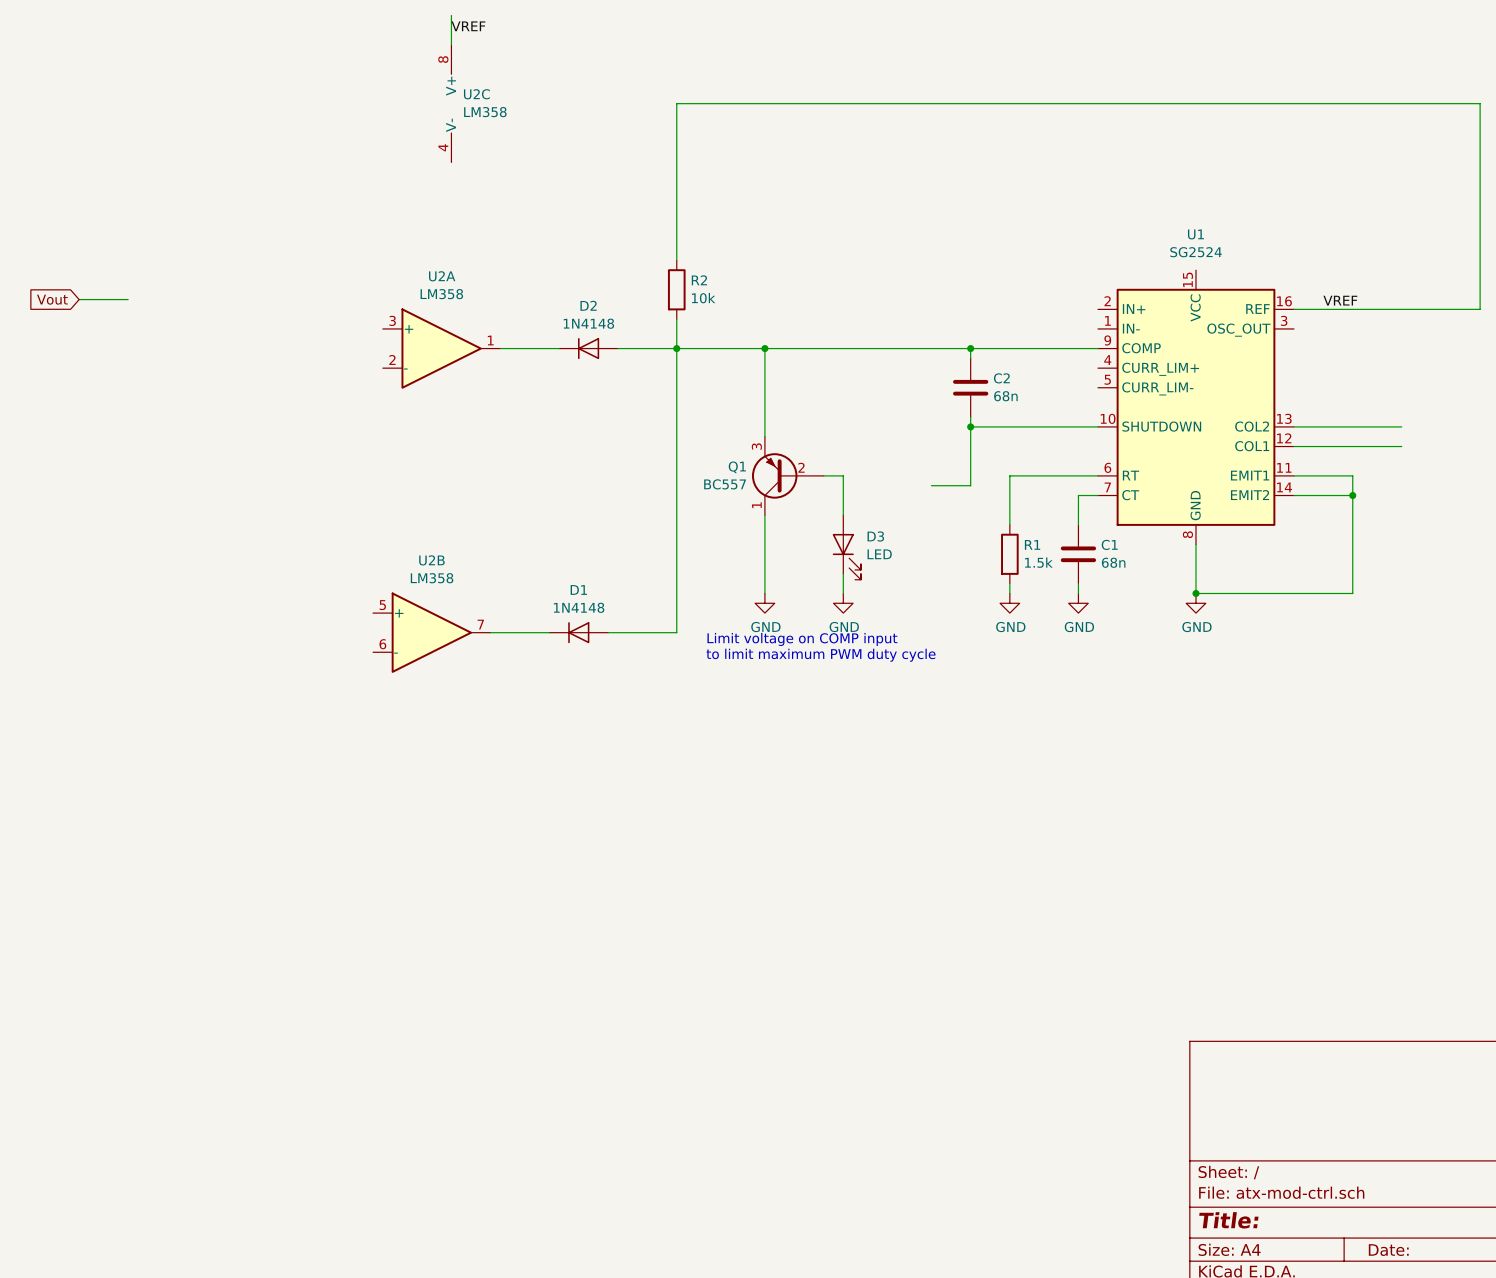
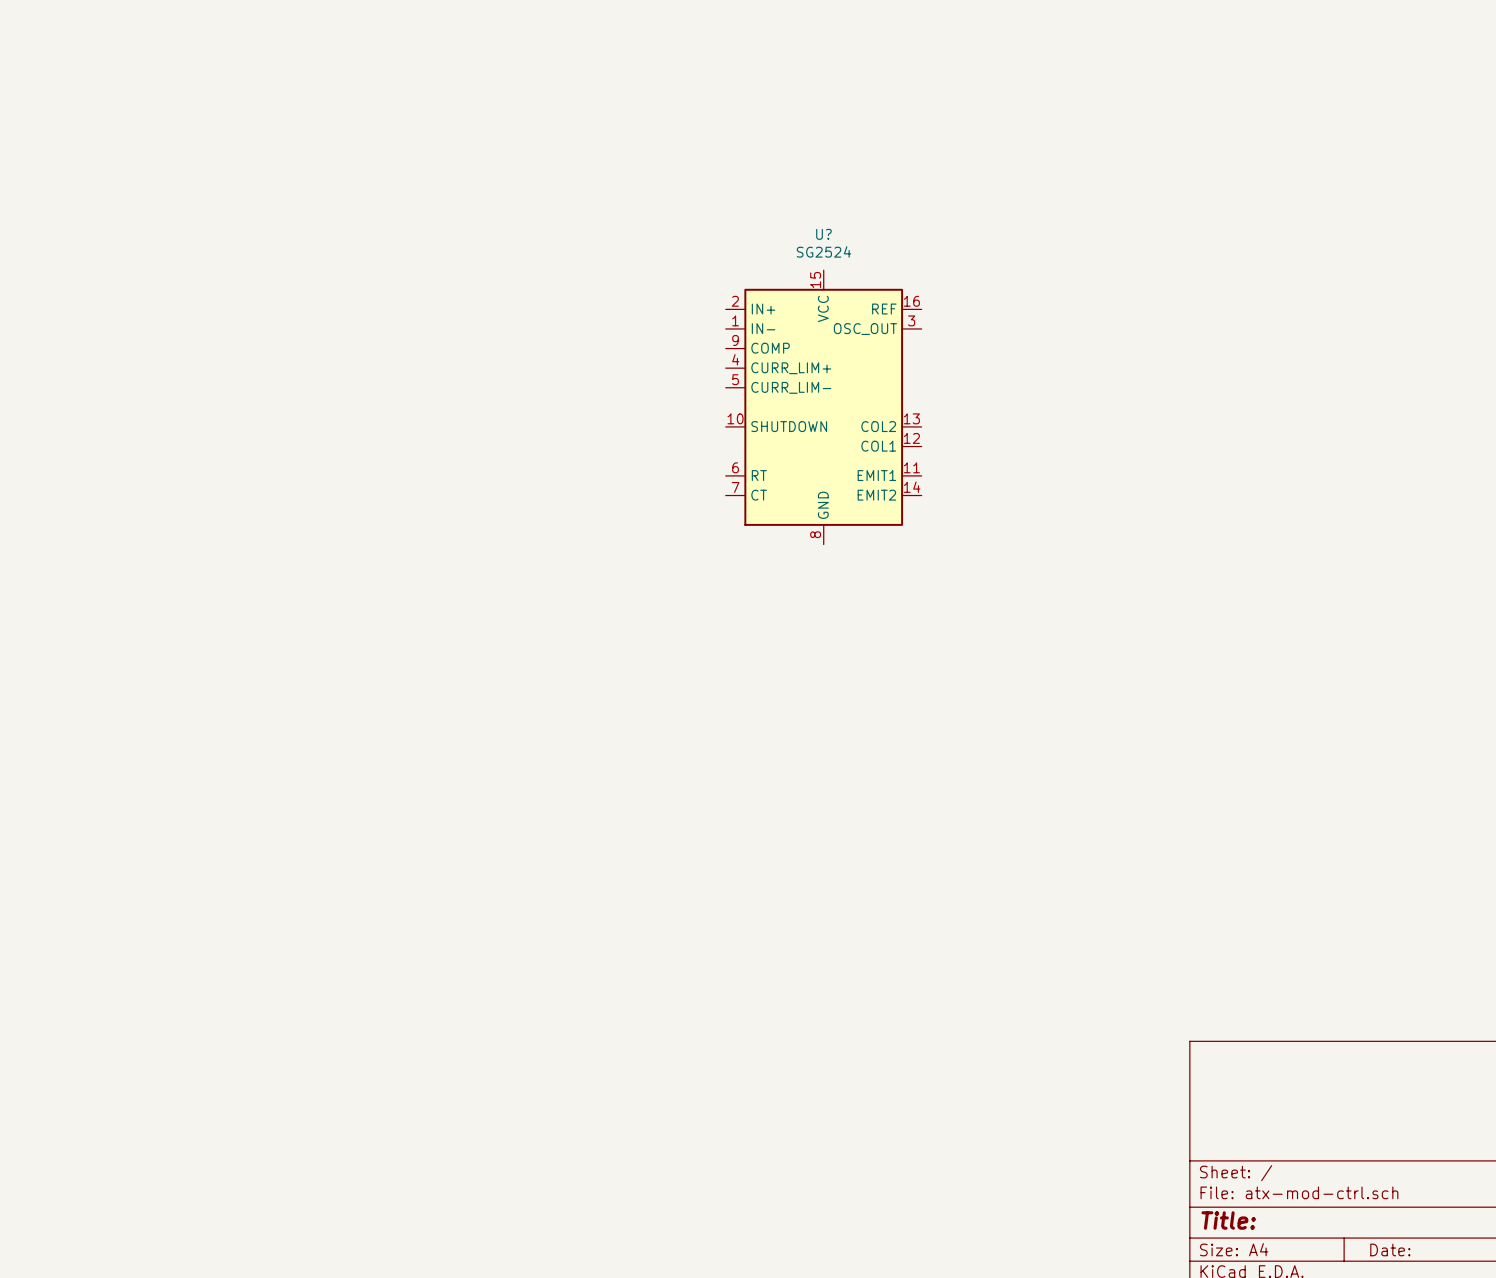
wire: (451, 15) (451, 44) -> none
label: VREF (468, 26) -> none
U2C: LM358 (451, 103) -> none
wire: (676, 260) (676, 103) (1480, 103) (1480, 309) (1293, 309) -> none
R2: 10k (676, 289) -> none
global label: Vout (52, 299) -> none
wire: (79, 299) (128, 299) -> none
label: VREF (1340, 300) -> none
wire: (676, 319) (676, 632) (608, 632) -> none
U2A: LM358 (441, 348) -> none
wire: (500, 348) (559, 348) -> none
D2: 1N4148 (588, 348) -> none
wire: (617, 348) (1098, 348) -> none
junction: (676, 348) -> none
junction: (764, 348) -> none
wire: (970, 348) (970, 358) -> none
junction: (970, 348) -> none
C2: 68n (970, 387) -> none
U?: none -> SG2524 (823, 407)
U1: SG2524 (1195, 407) -> none
wire: (970, 417) (970, 485) (931, 485) -> none
wire: (970, 426) (1098, 426) -> none
junction: (970, 426) -> none
wire: (1293, 426) (1401, 426) -> none
wire: (1293, 446) (1401, 446) -> none
Q1: BC557 (787, 475) -> none
wire: (1098, 475) (1009, 475) (1009, 524) -> none
wire: (1293, 475) (1352, 475) (1352, 593) (1195, 593) (1195, 544) -> none
wire: (1098, 495) (1078, 495) (1078, 524) -> none
wire: (1293, 495) (1352, 495) -> none
junction: (1352, 495) -> none
wire: (764, 515) (764, 593) -> none
D3: LED (846, 547) -> none
R1: 1.5k (1009, 554) -> none
C1: 68n (1078, 554) -> none
wire: (843, 573) (843, 593) -> none
wire: (1009, 583) (1009, 593) -> none
wire: (1078, 583) (1078, 593) -> none
junction: (1195, 593) -> none
power symbol: GND (764, 603) -> none
power symbol: GND (843, 603) -> none
power symbol: GND (1009, 603) -> none
power symbol: GND (1078, 603) -> none
power symbol: GND (1195, 603) -> none
U2B: LM358 (431, 632) -> none
wire: (490, 632) (549, 632) -> none
D1: 1N4148 (578, 632) -> none
text: Limit voltage on COMP input (802, 639) -> none
text: to limit maximum PWM duty cycle (821, 655) -> none

